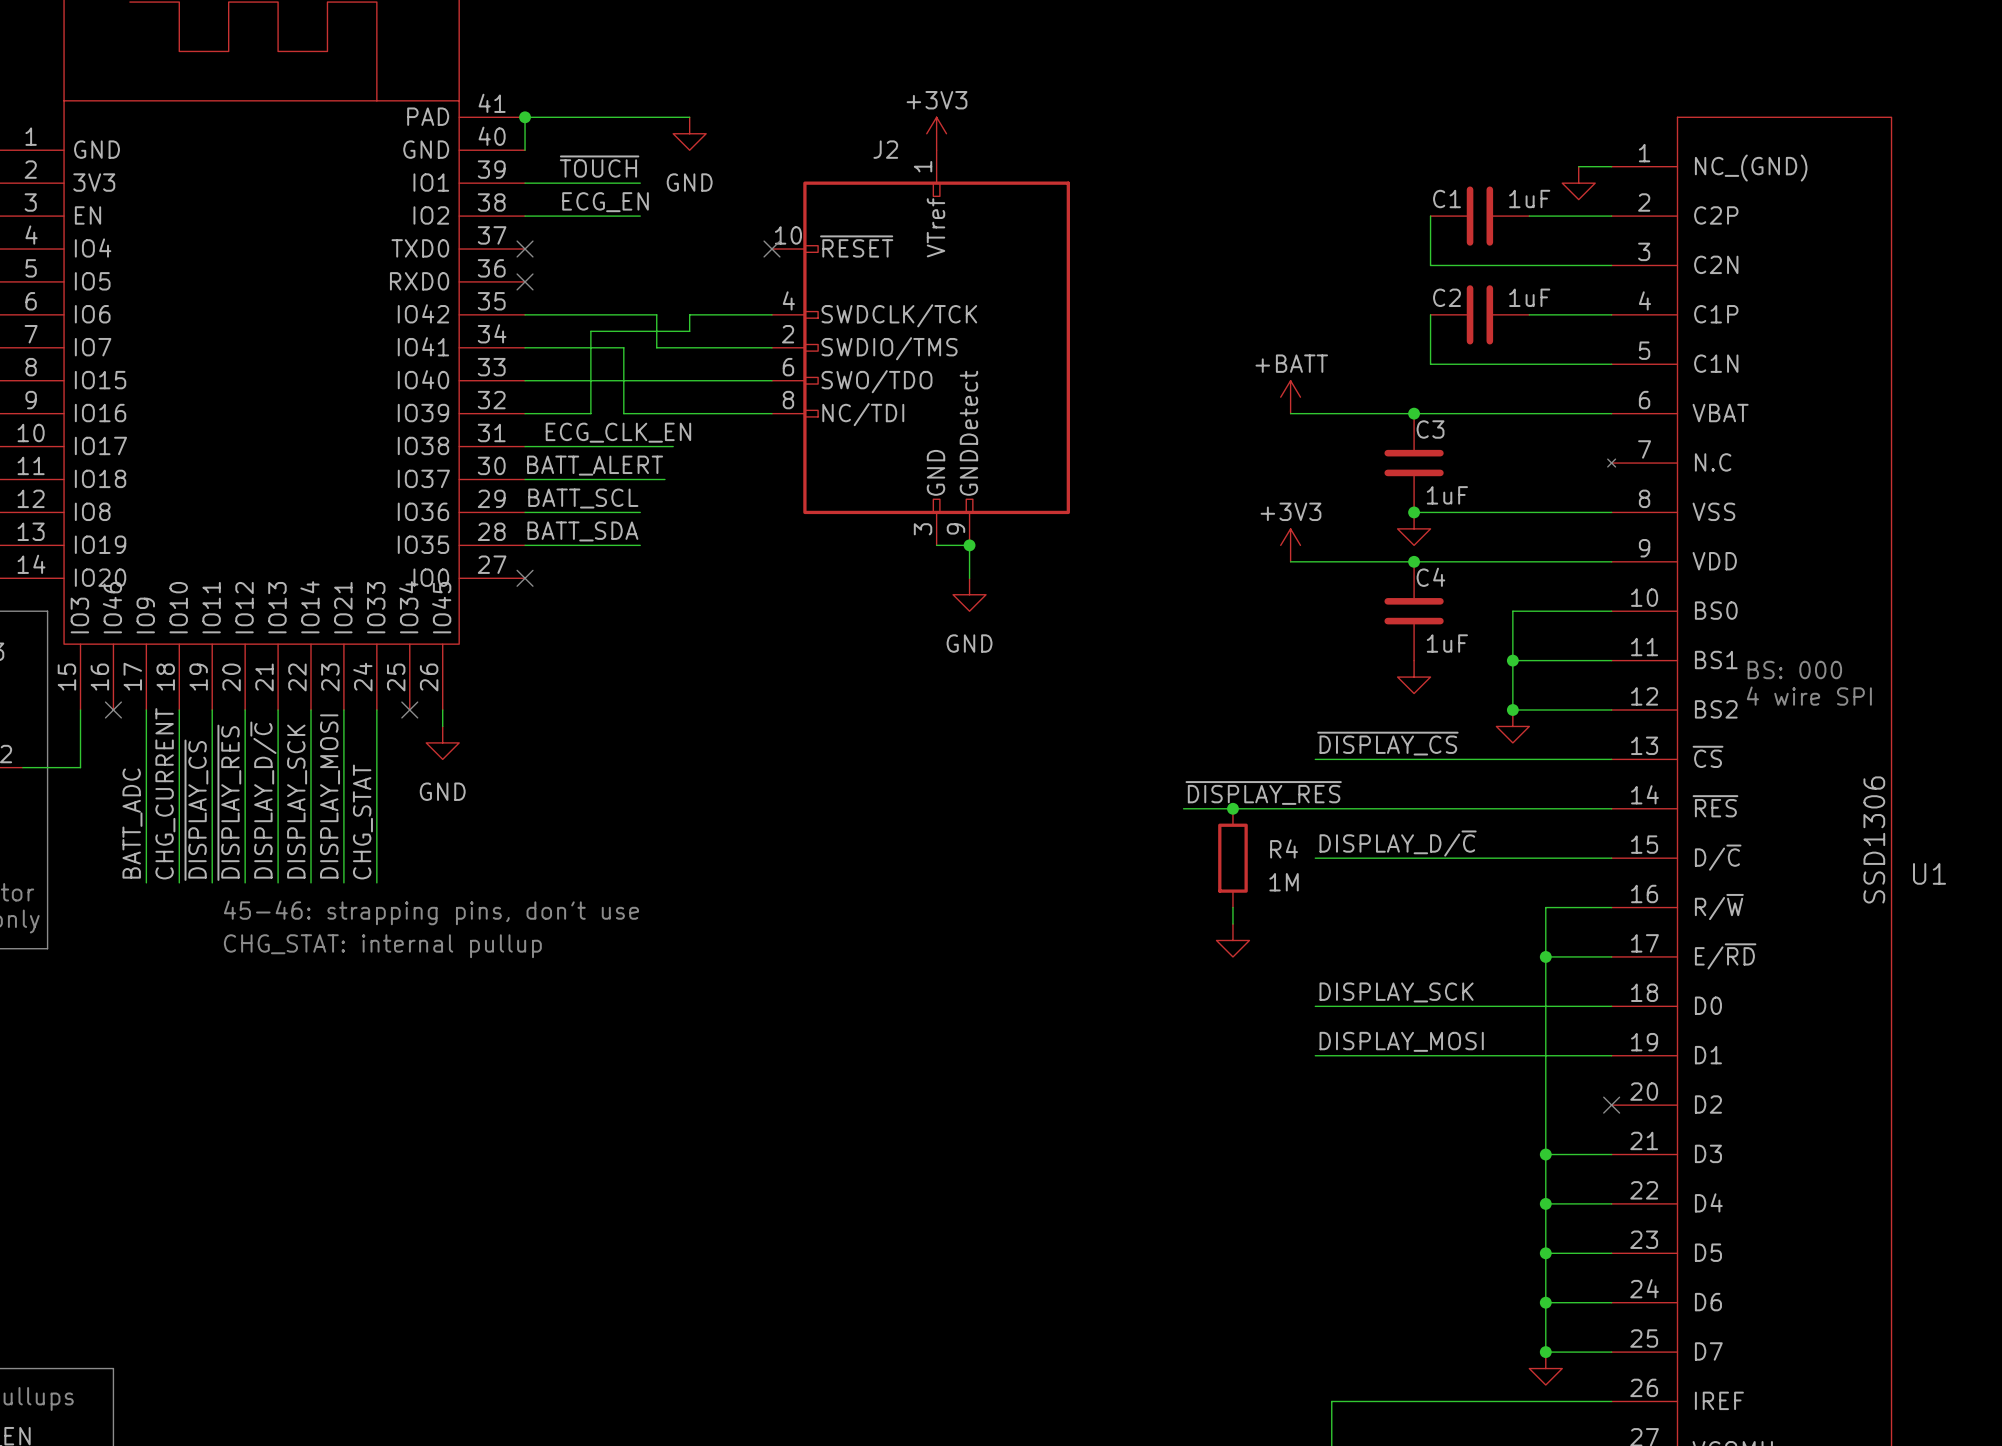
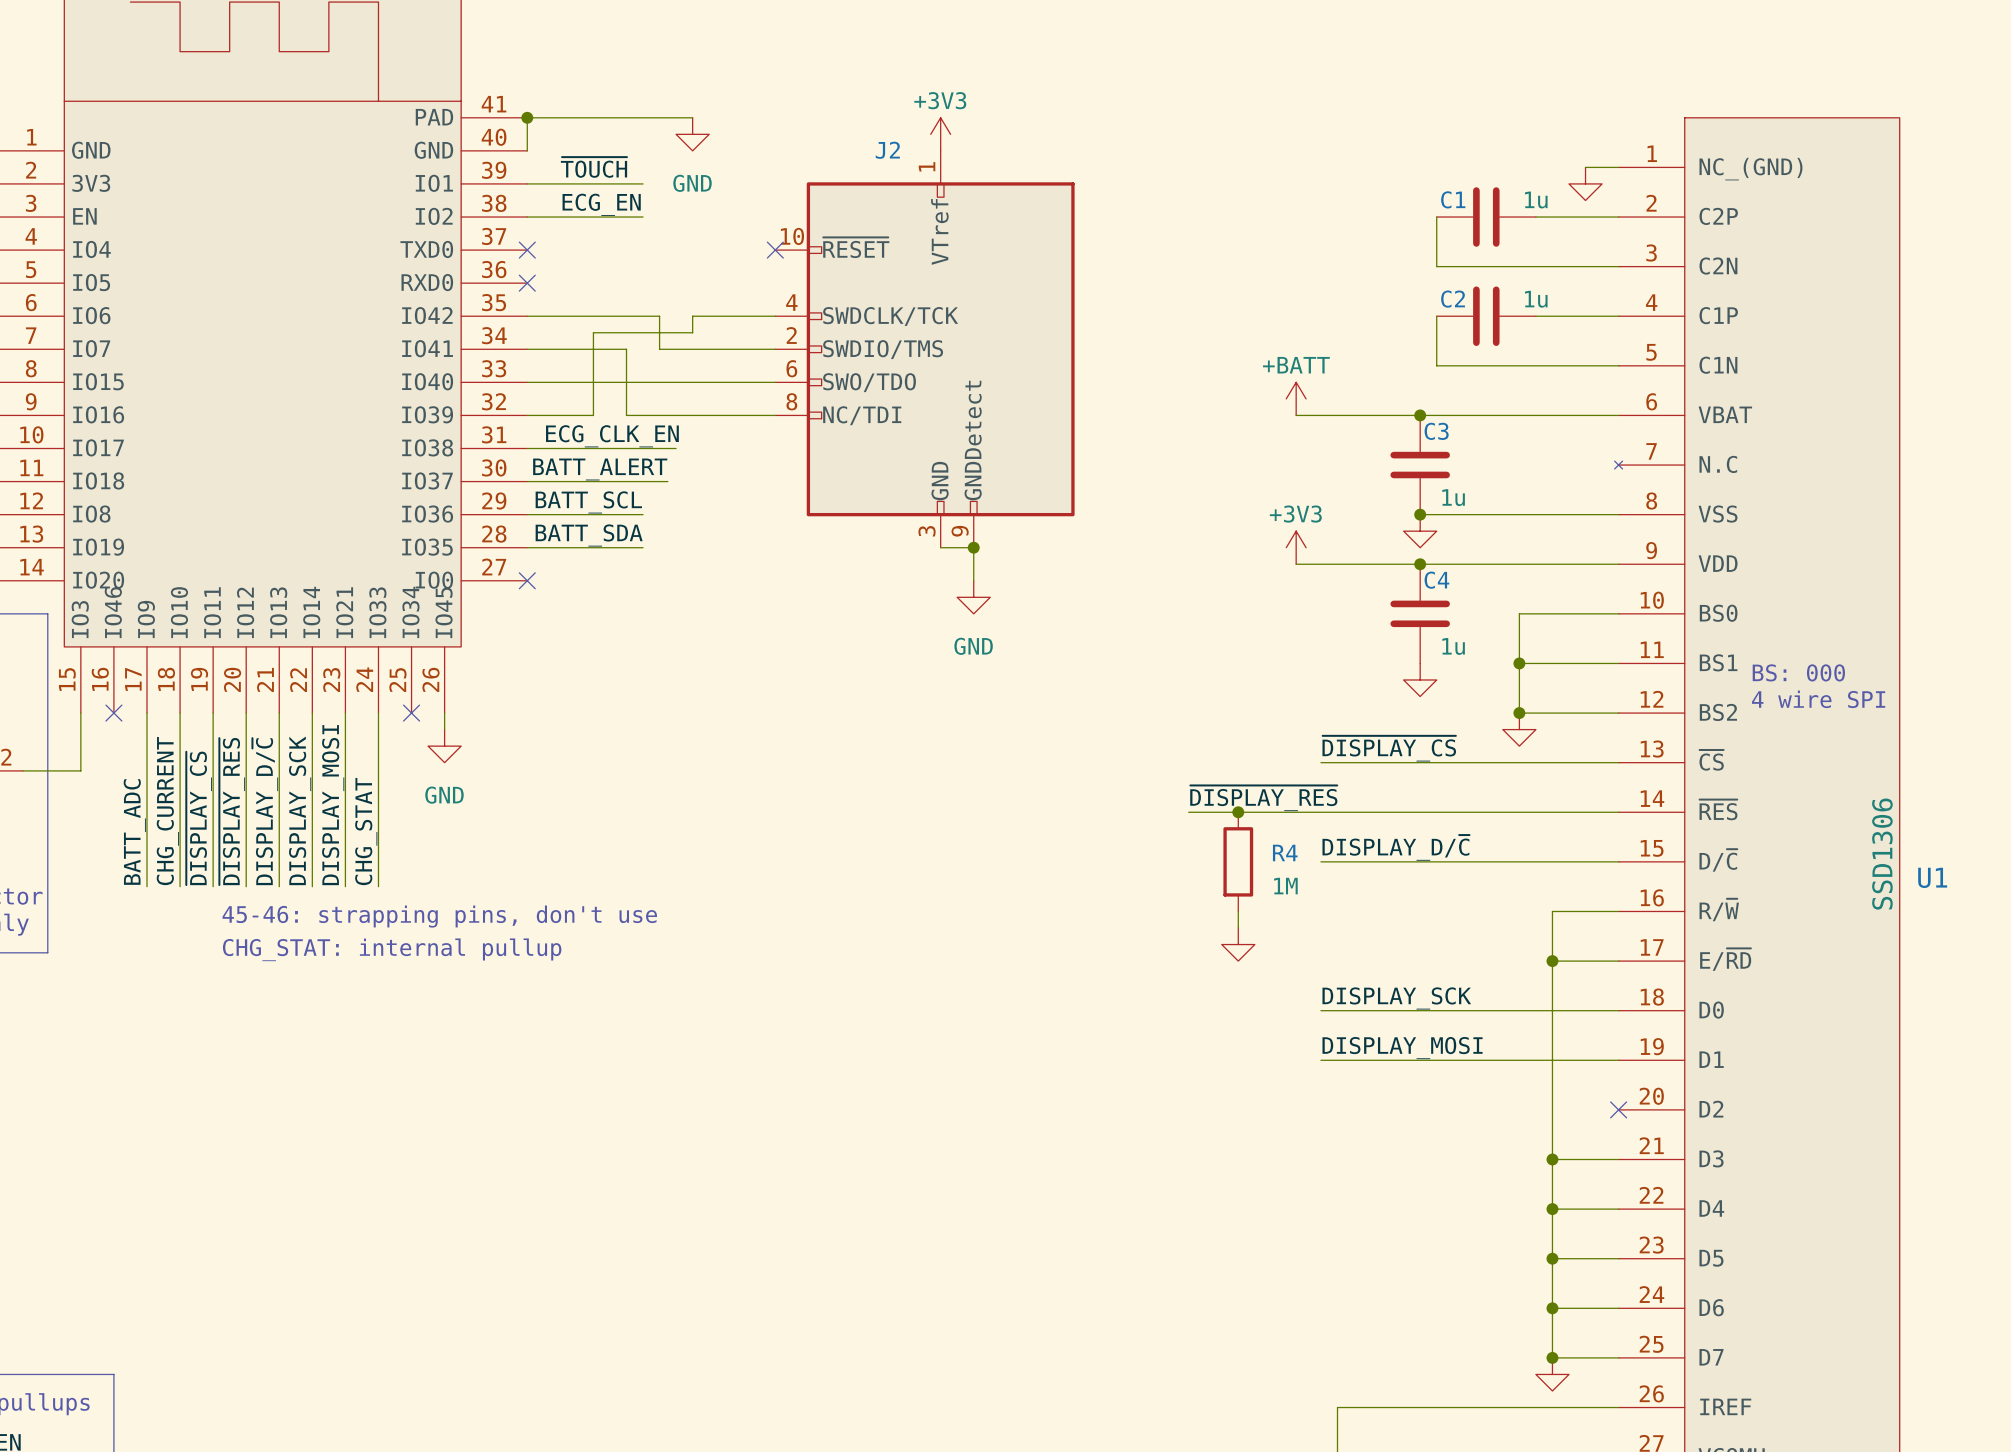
C1 value: 1uF (1529, 199) -> 1u (1536, 200)
C2 value: 1uF (1529, 297) -> 1u (1536, 299)
C3 value: 1uF (1447, 495) -> 1u (1453, 497)
C4 value: 1uF (1447, 643) -> 1u (1453, 646)

